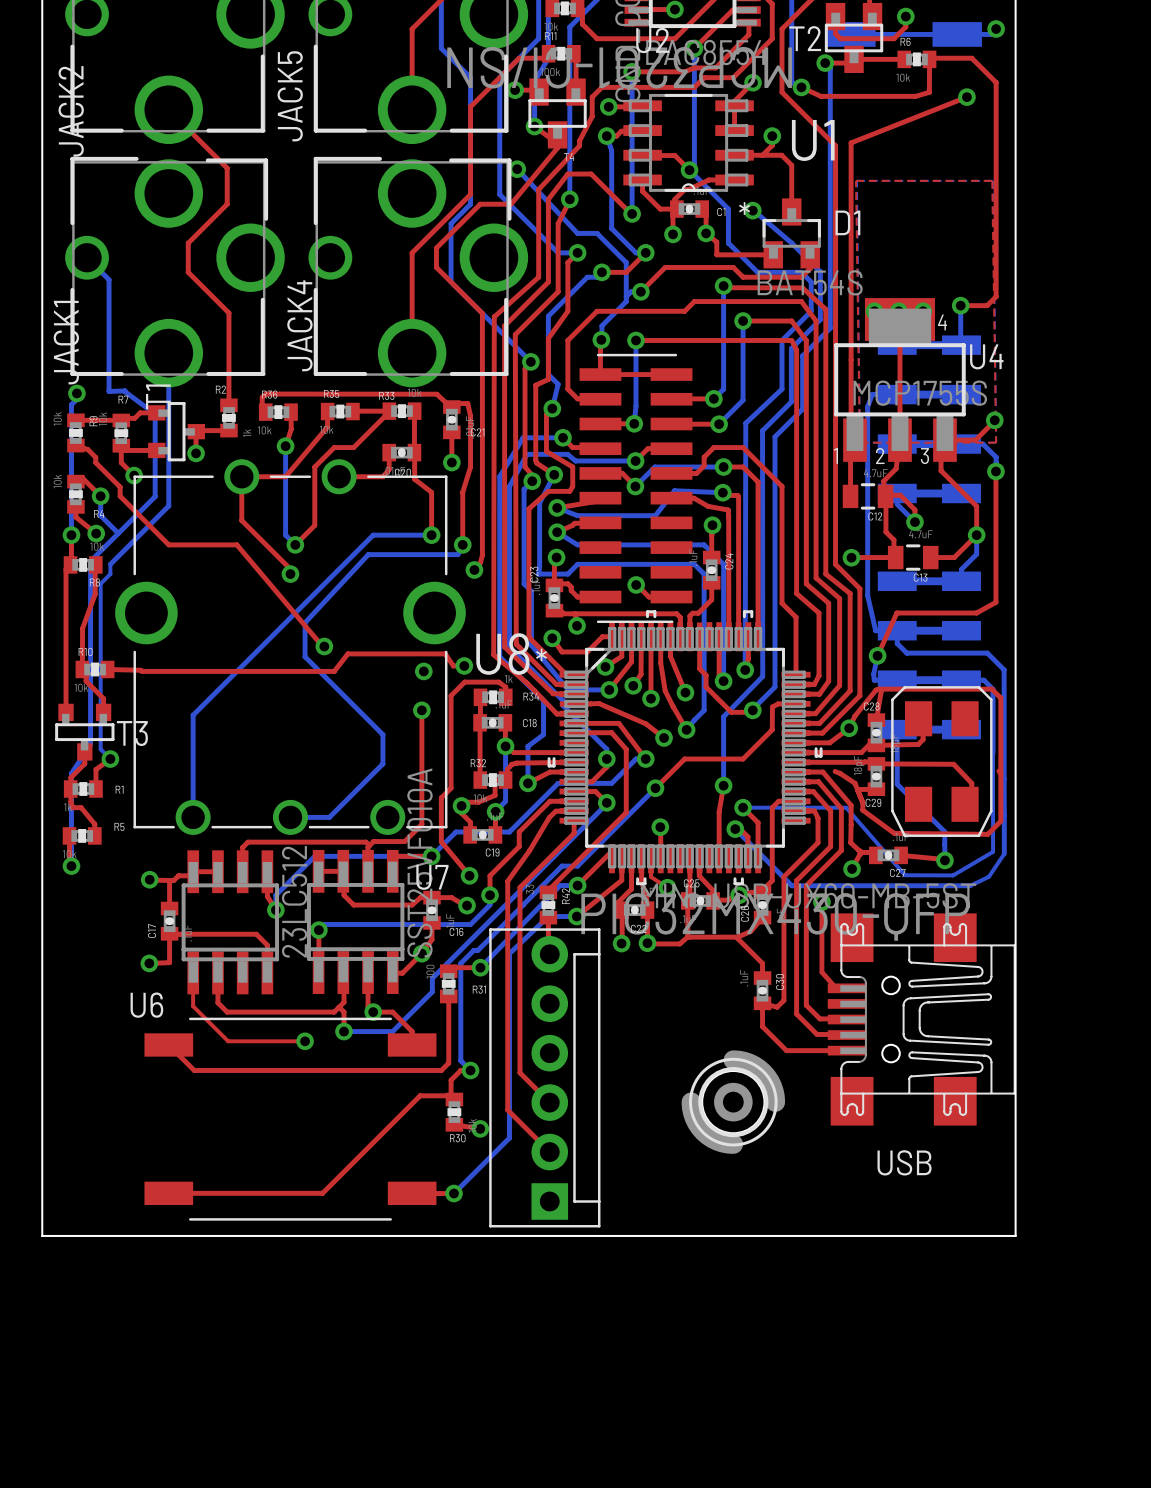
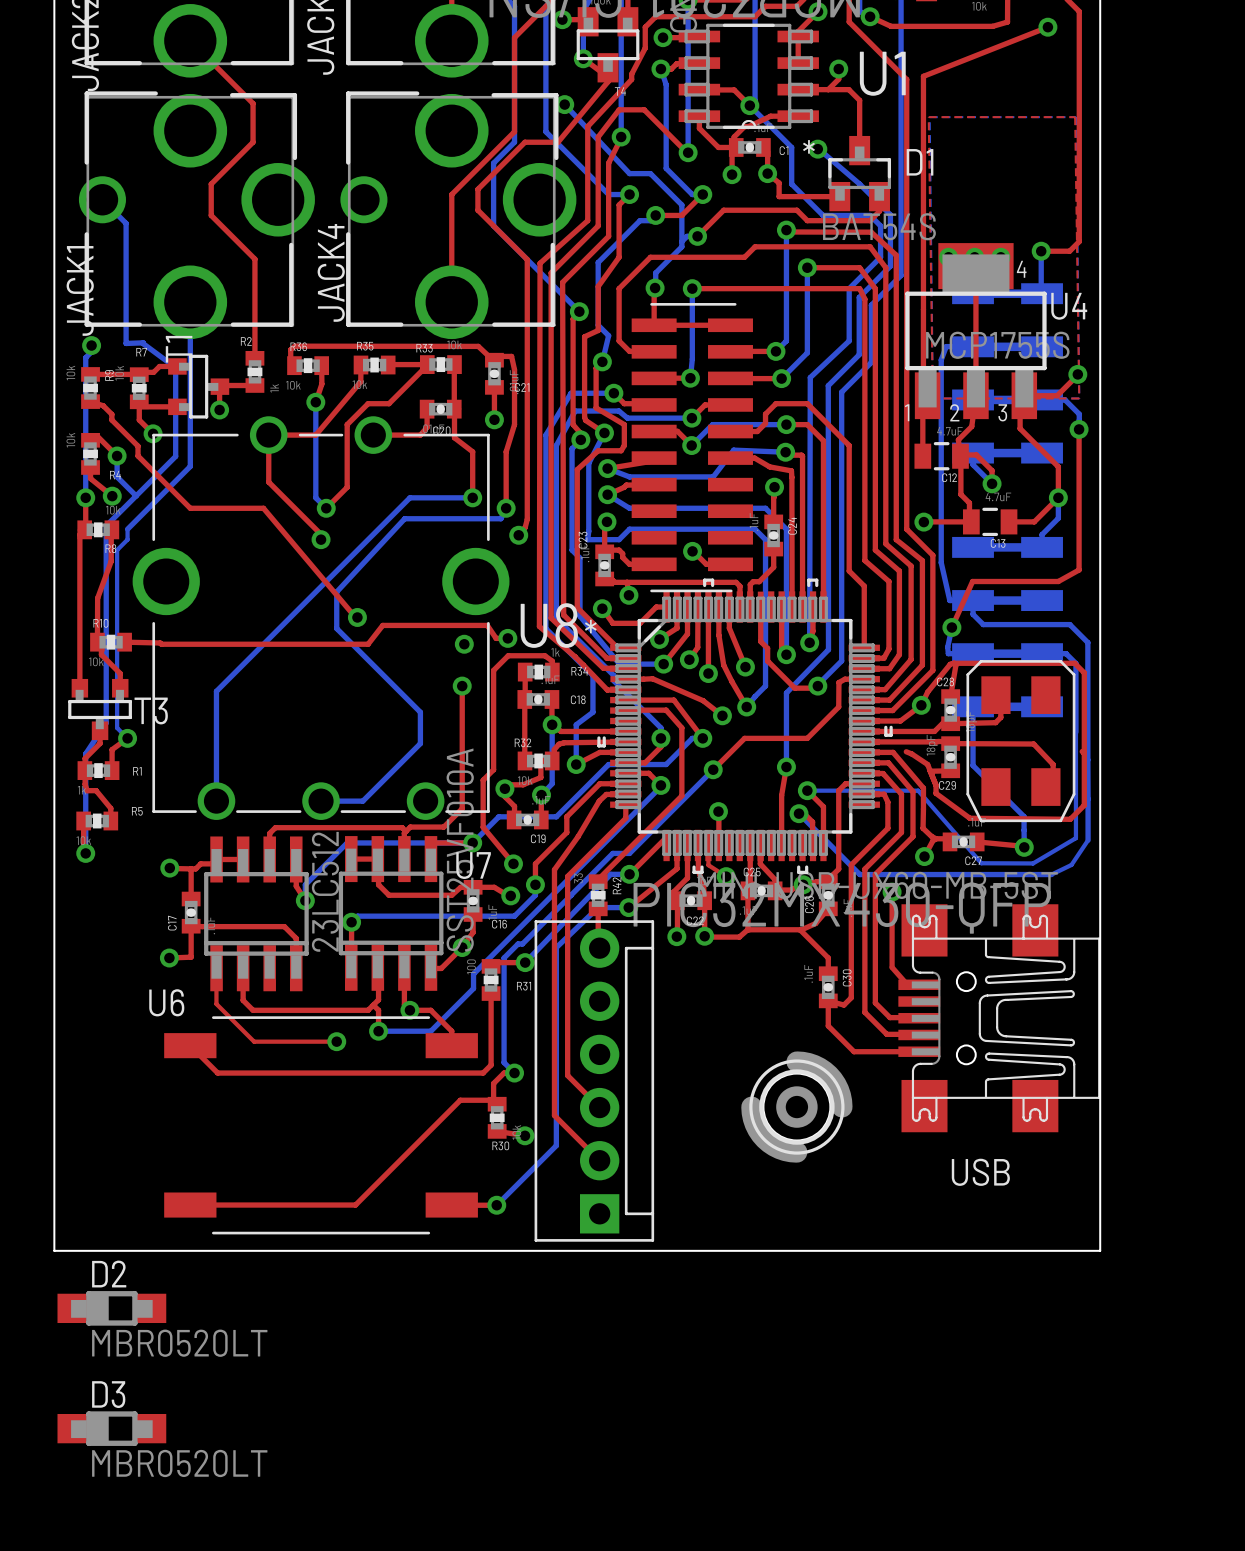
D2: none -> MBR0520LT (111, 1308)
D3: none -> MBR0520LT (111, 1428)

